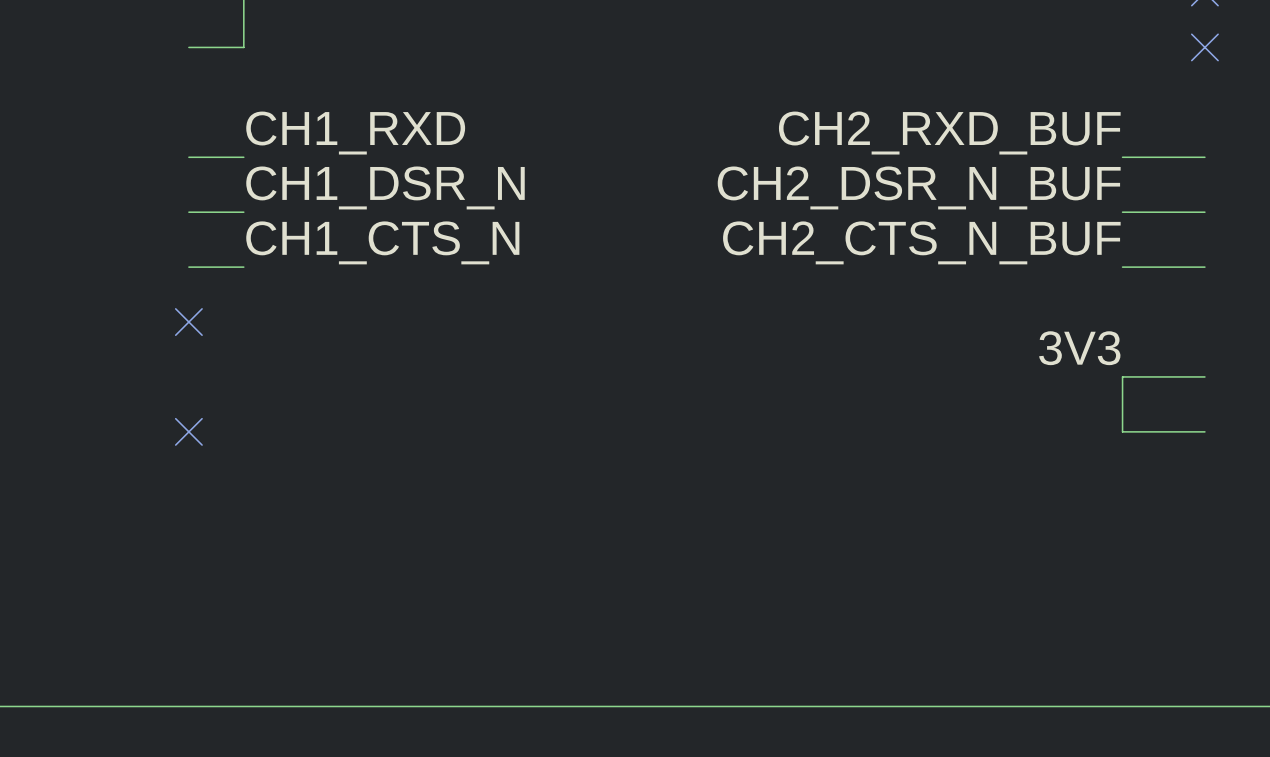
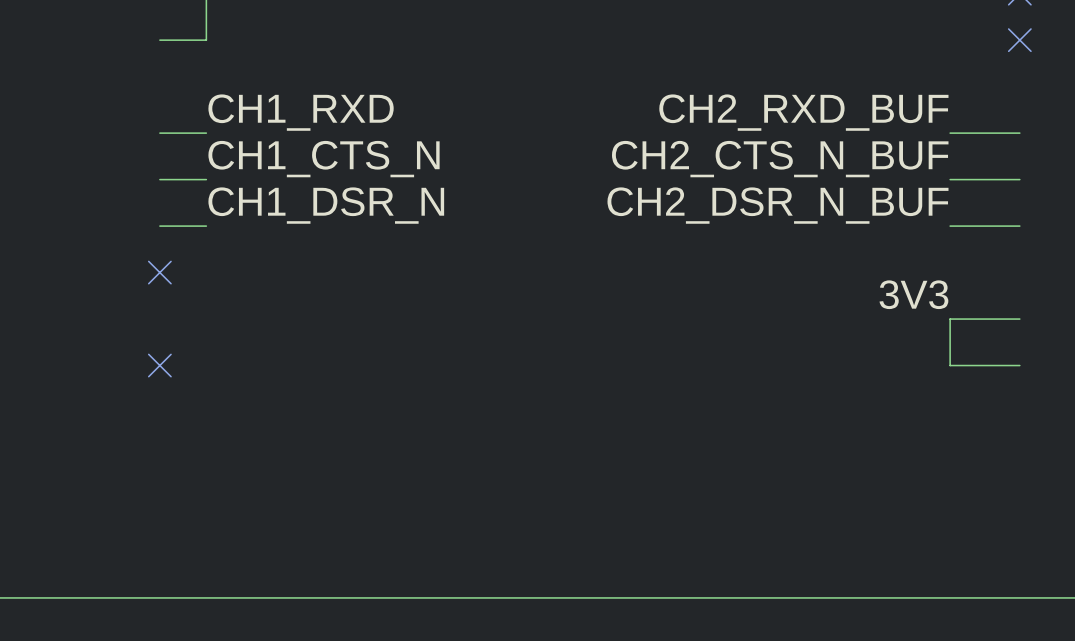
label: CH1_DSR_N (385, 187) -> CH1_CTS_N (324, 159)
label: CH2_DSR_N_BUF (919, 187) -> CH2_CTS_N_BUF (780, 159)
label: CH1_CTS_N (382, 242) -> CH1_DSR_N (326, 205)
label: CH2_CTS_N_BUF (921, 242) -> CH2_DSR_N_BUF (777, 205)

